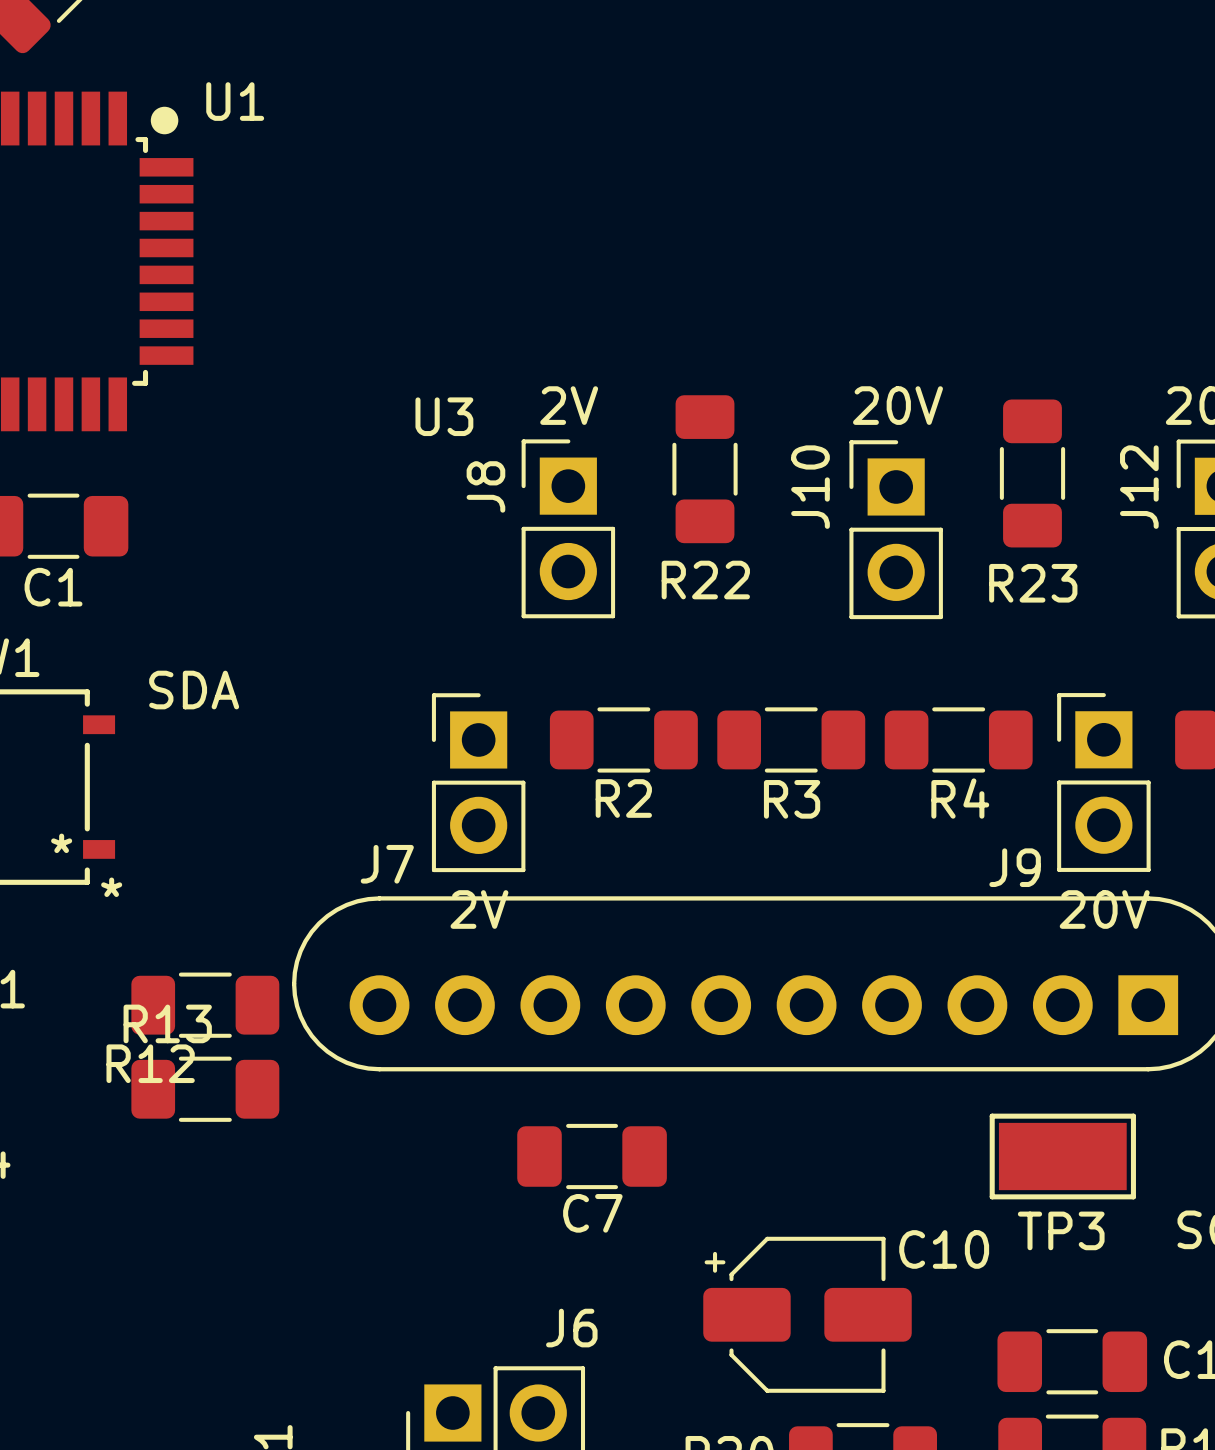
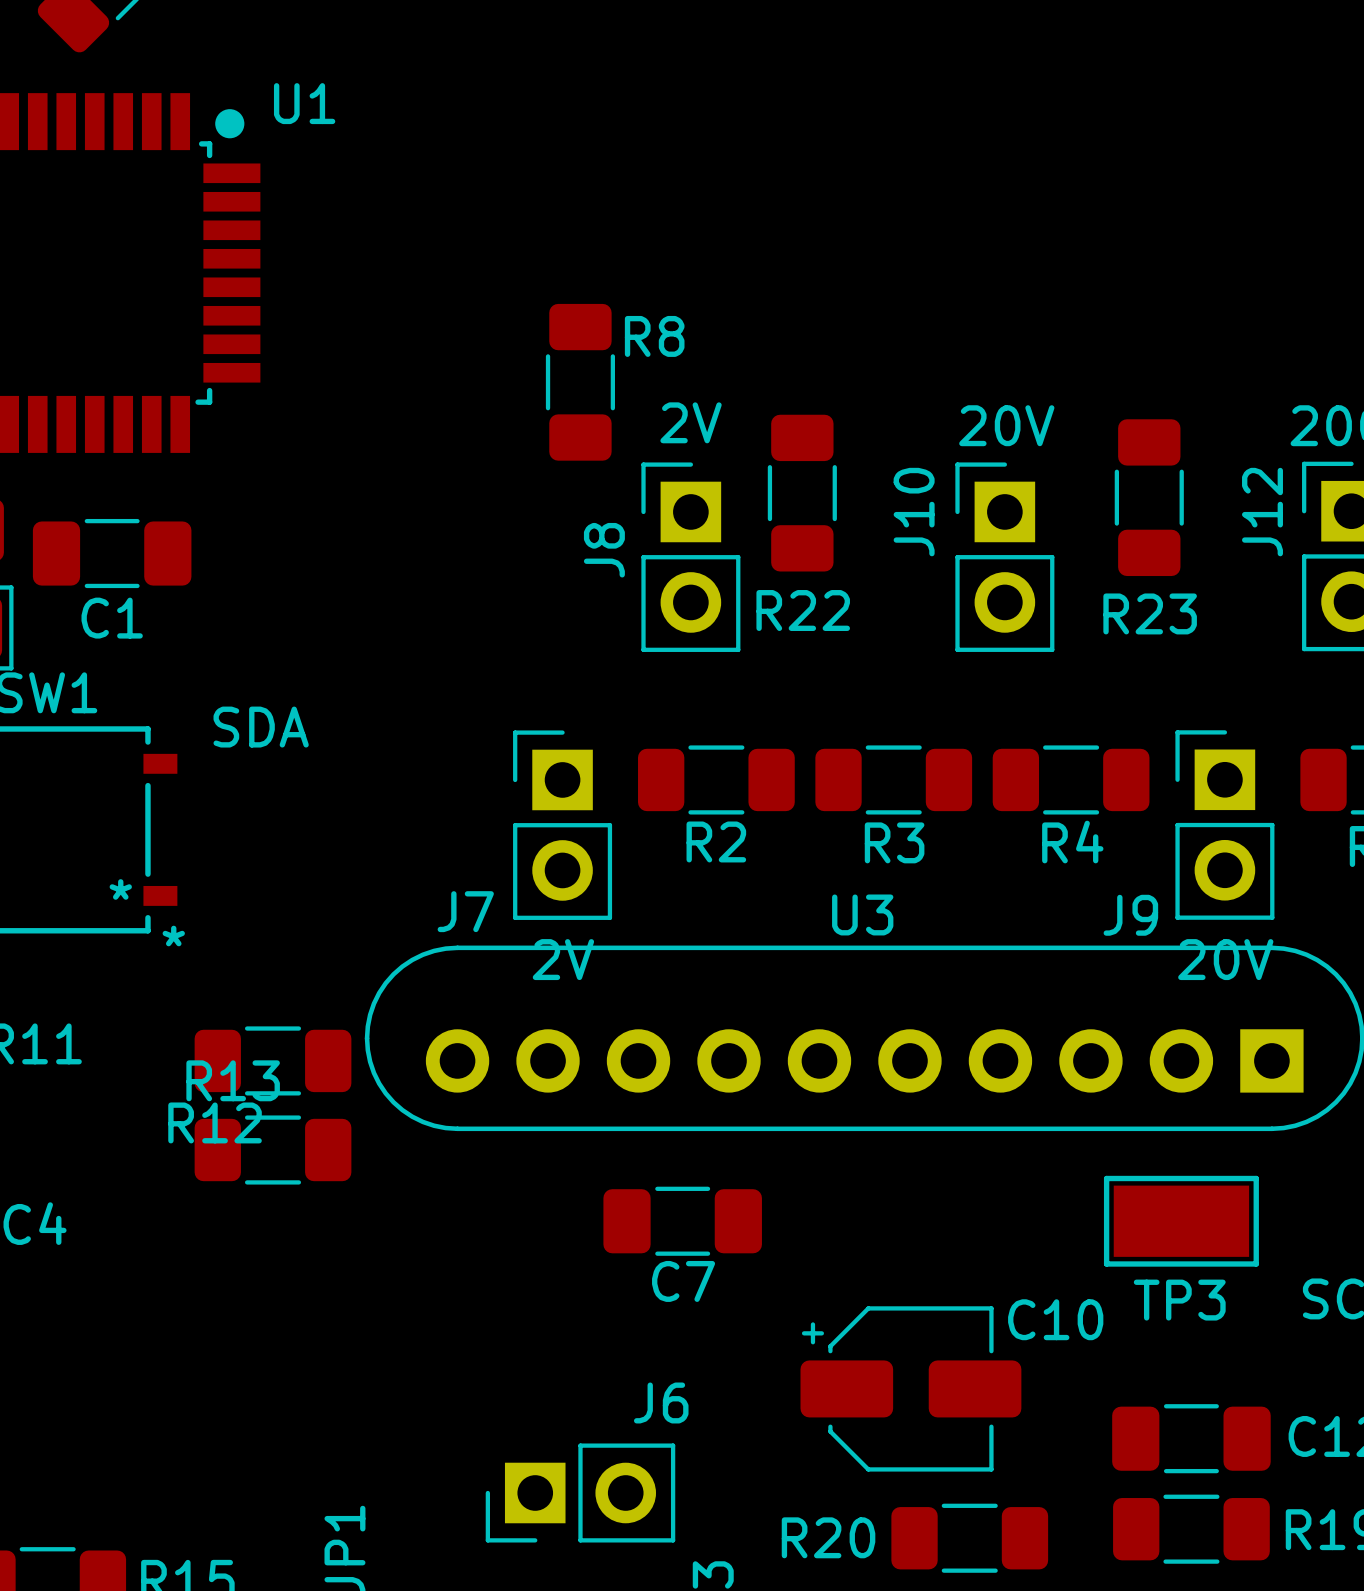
R8: none -> (580, 382)
text position: 2V (569, 405) -> 2V (691, 422)
U3 name position: U3 (444, 416) -> U3 (862, 914)
J8 name position: J8 (485, 486) -> J8 (604, 550)
J8 position: (568, 528) -> (690, 557)

